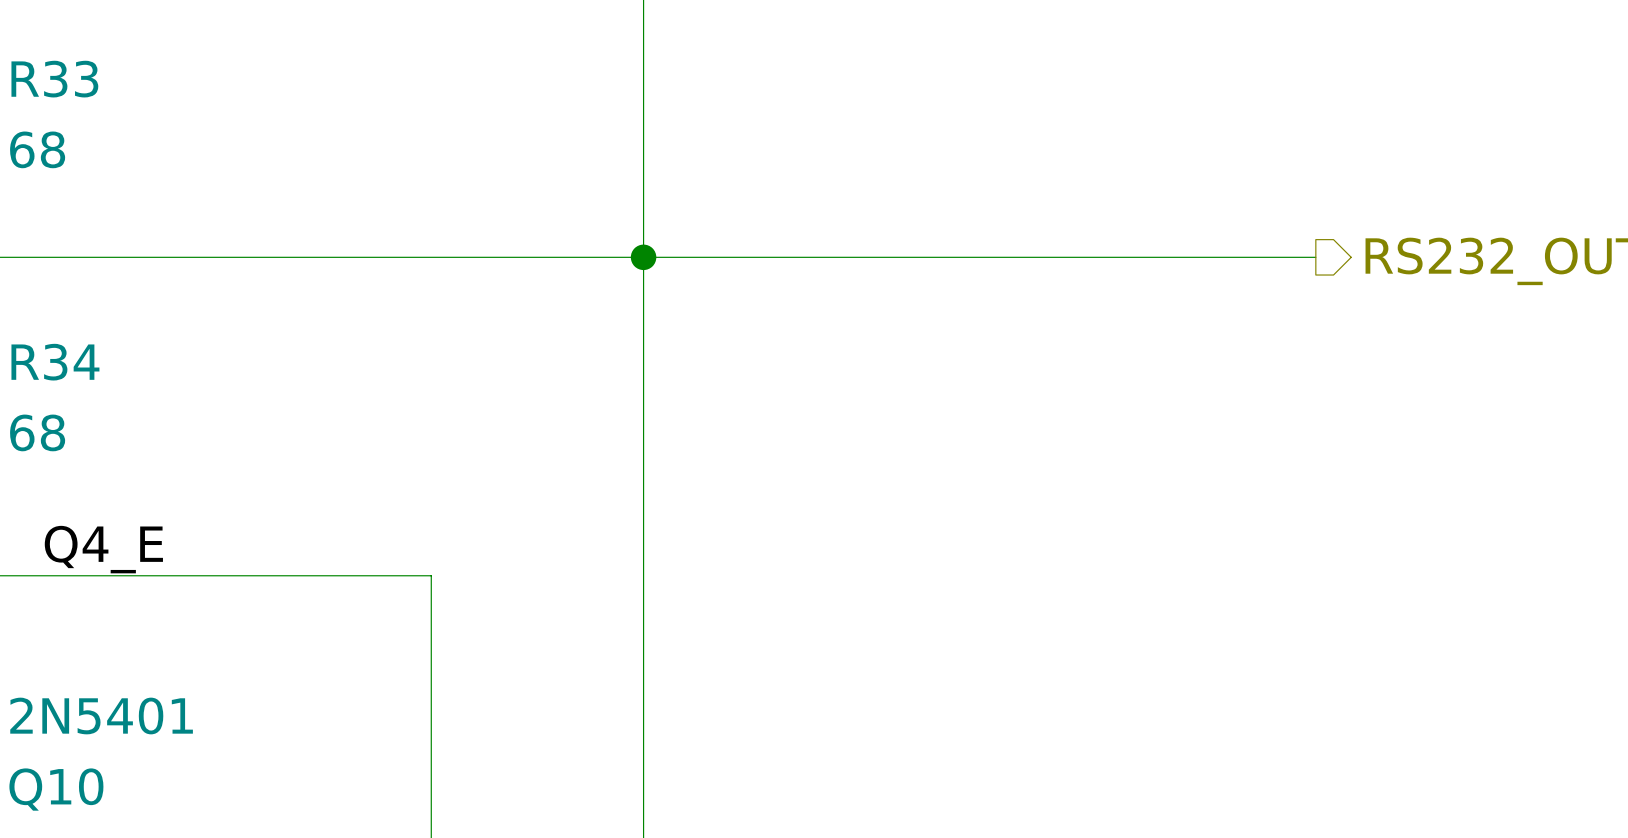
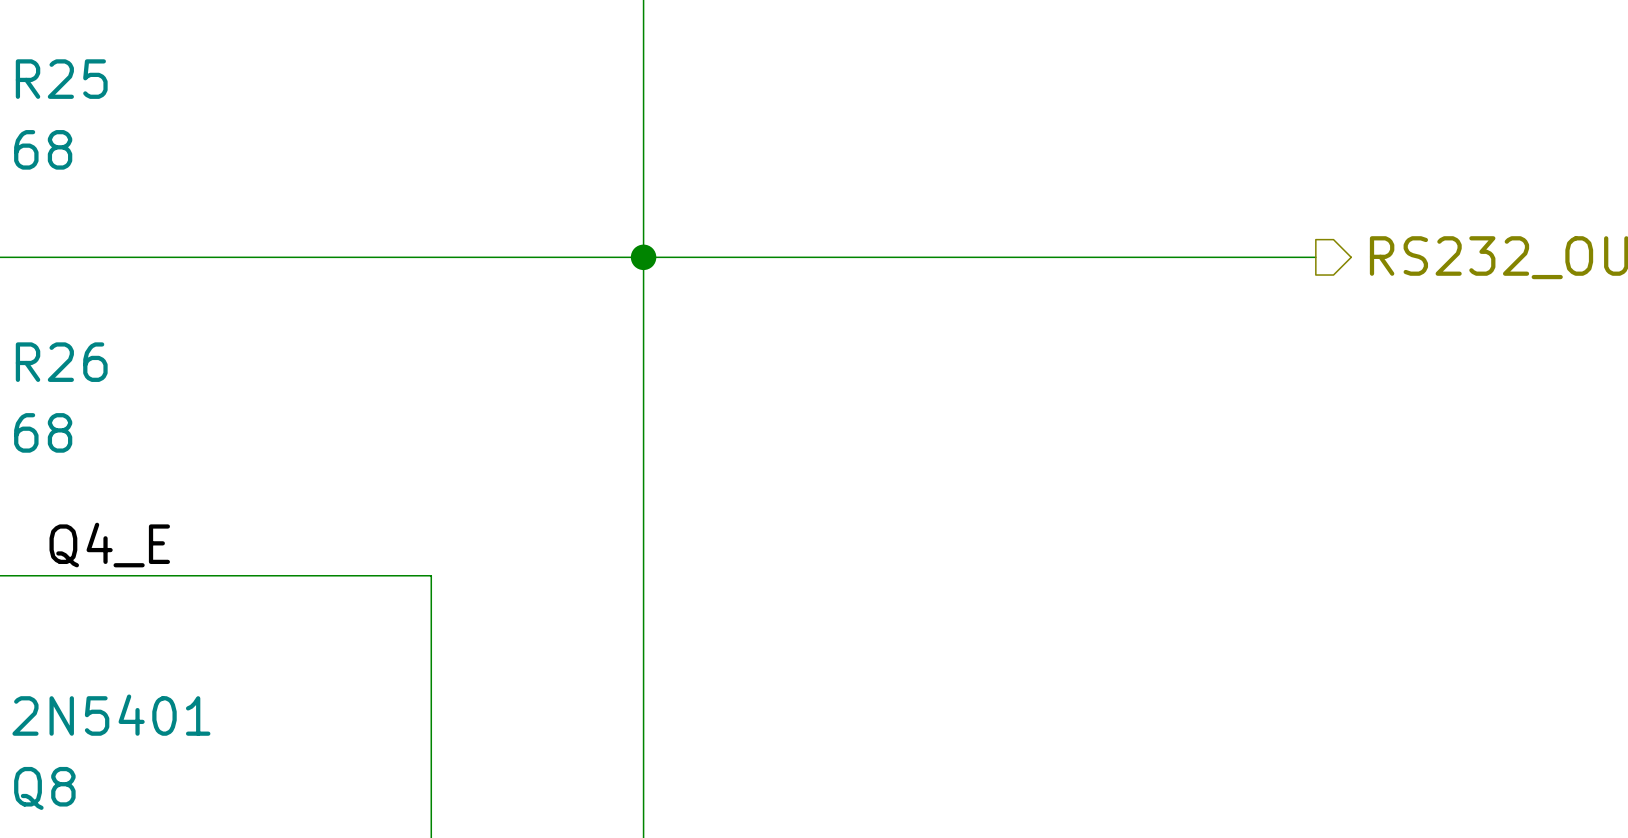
R33 name: R33 (54, 79) -> R25 (61, 79)
R34 name: R34 (55, 362) -> R26 (61, 362)
Q10 name: Q10 (56, 789) -> Q8 (44, 788)

